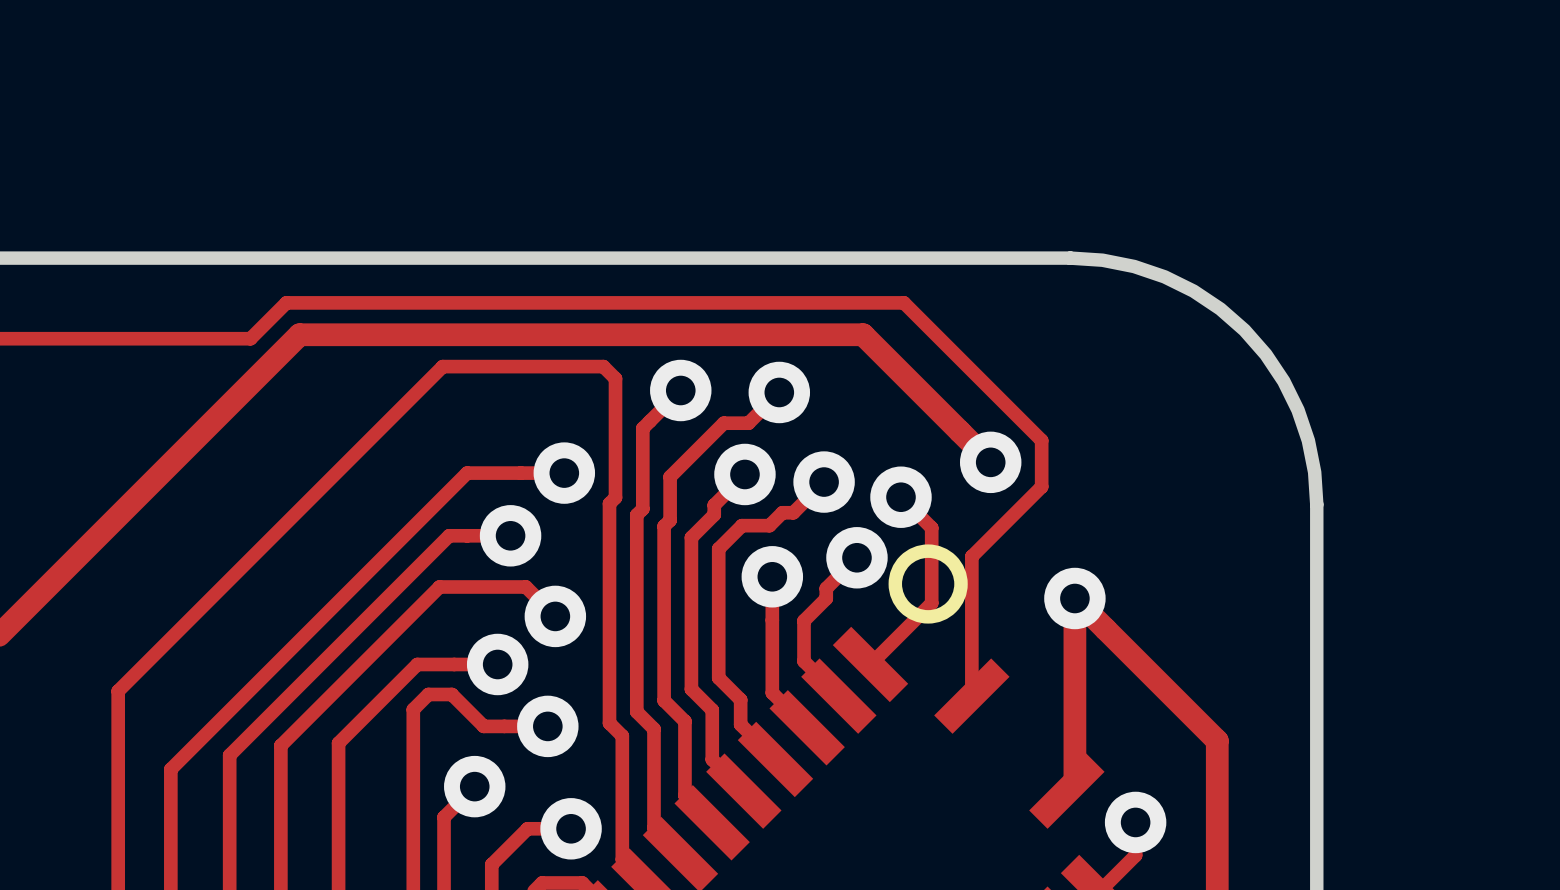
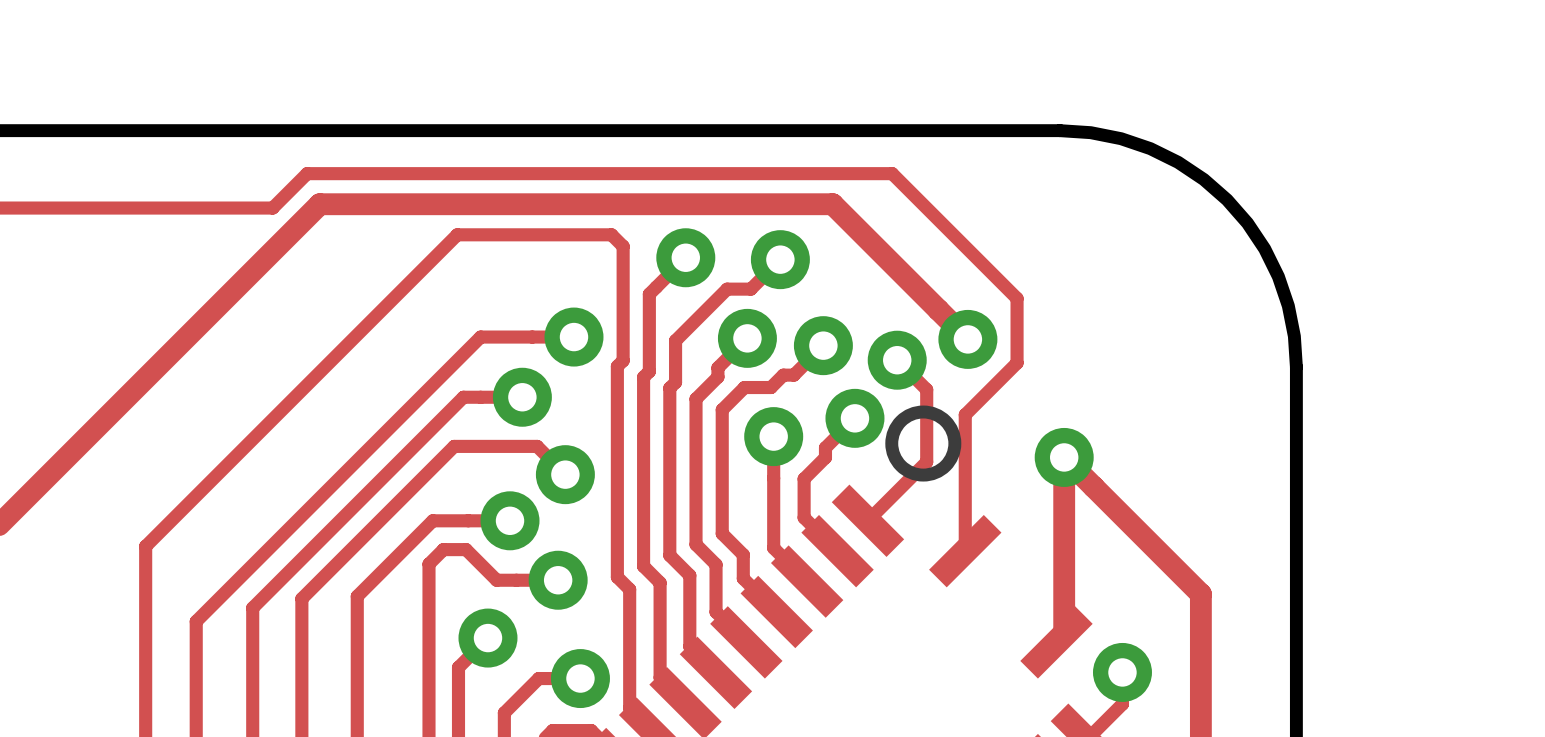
track: (895, 302) (904, 302) (1041, 440) (1041, 486) (971, 556) -> (892, 173) (1017, 298) (1017, 363) (965, 414) (965, 417)
track: (833, 334) (863, 334) (990, 462) -> (832, 204) (967, 339)
via position: (990, 462) -> (967, 339)

